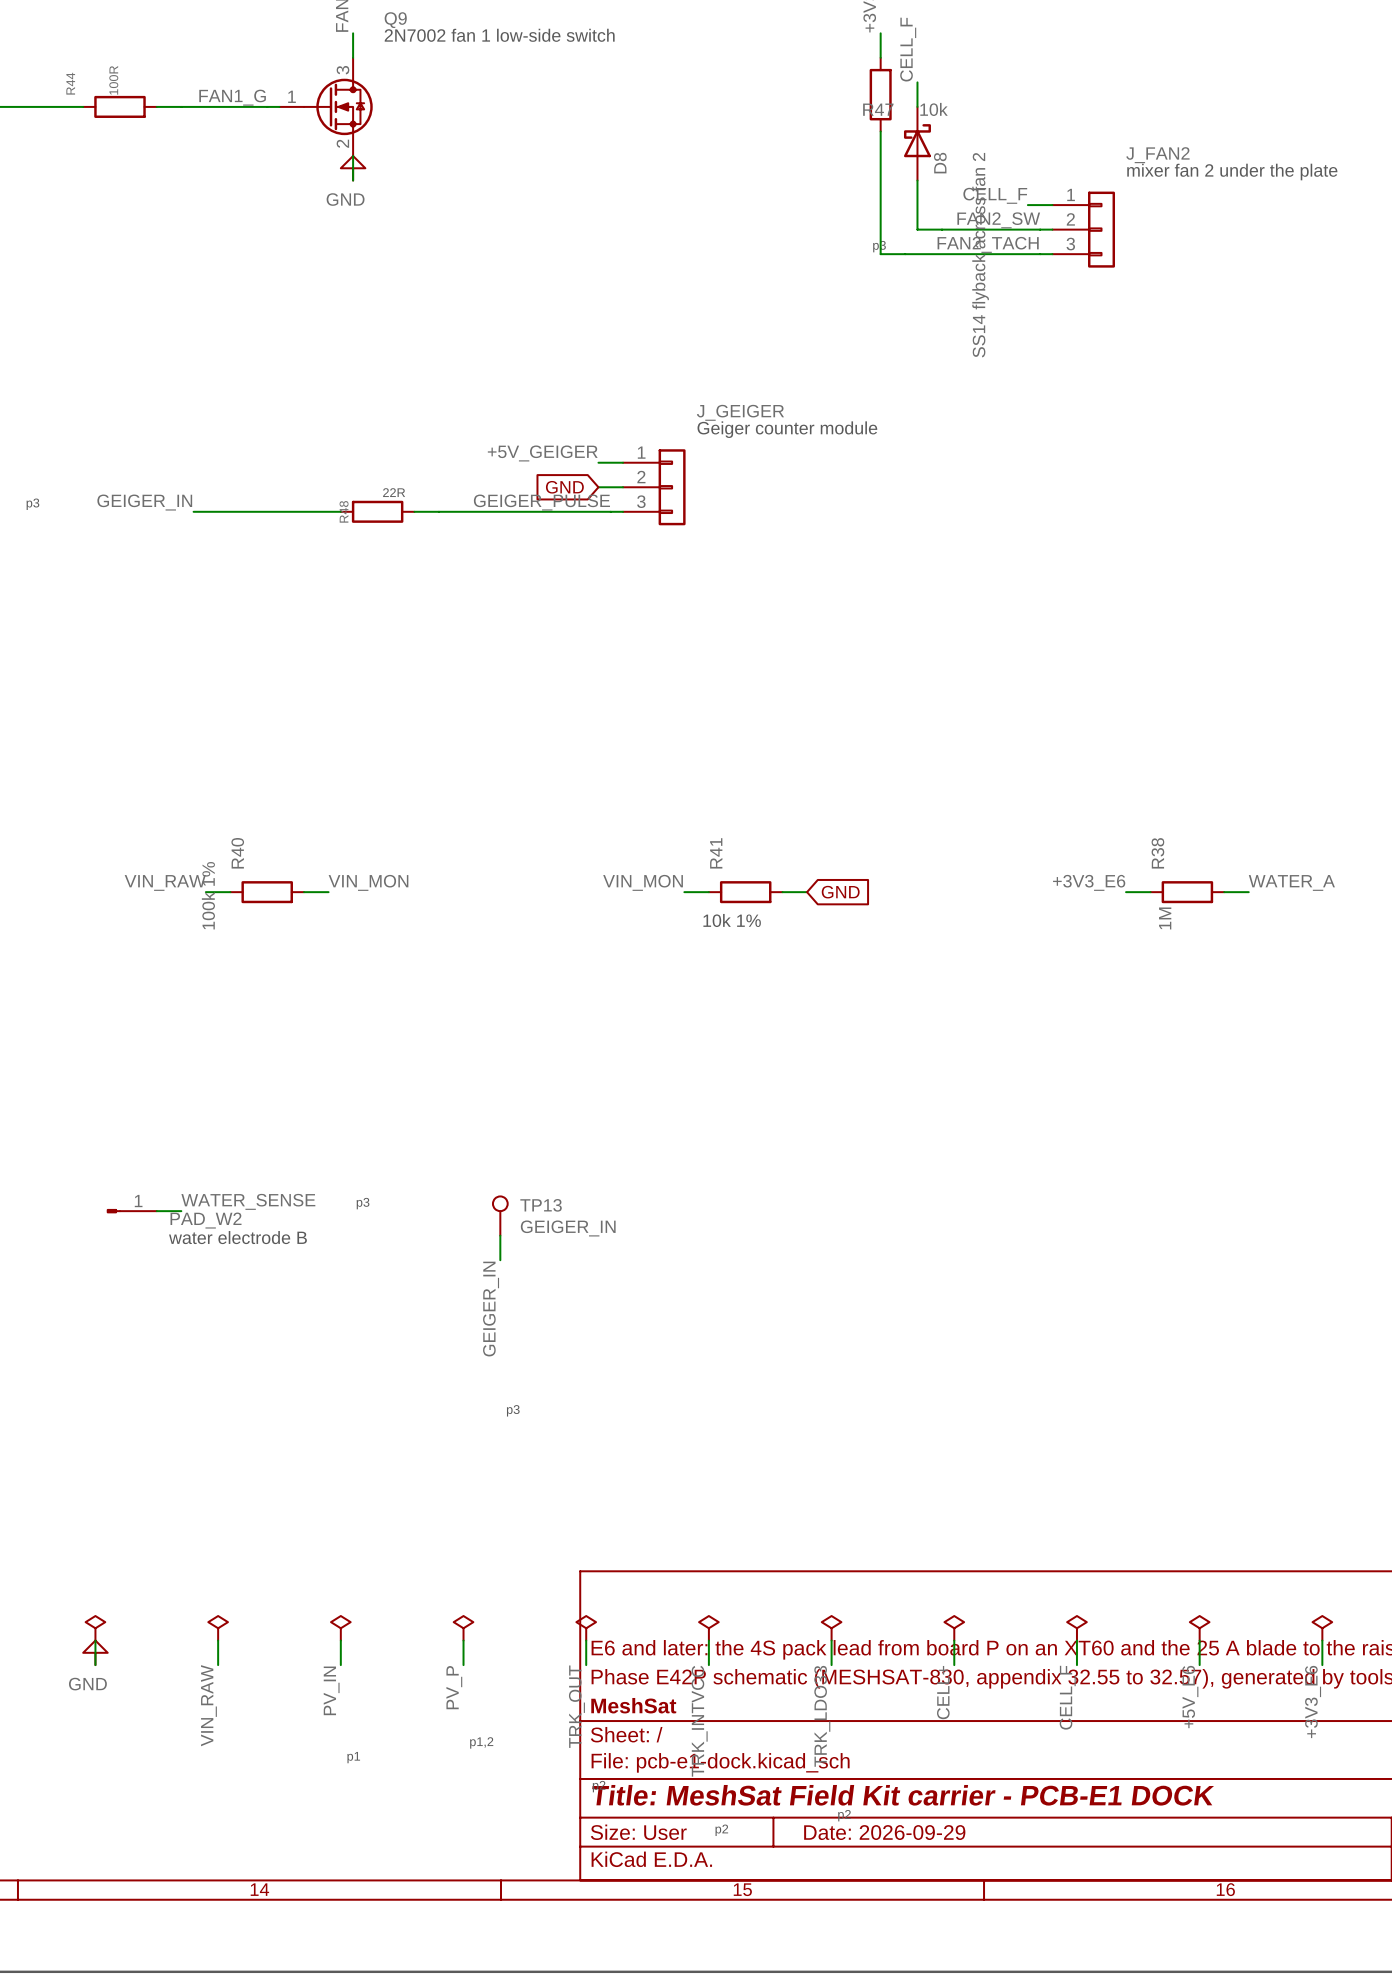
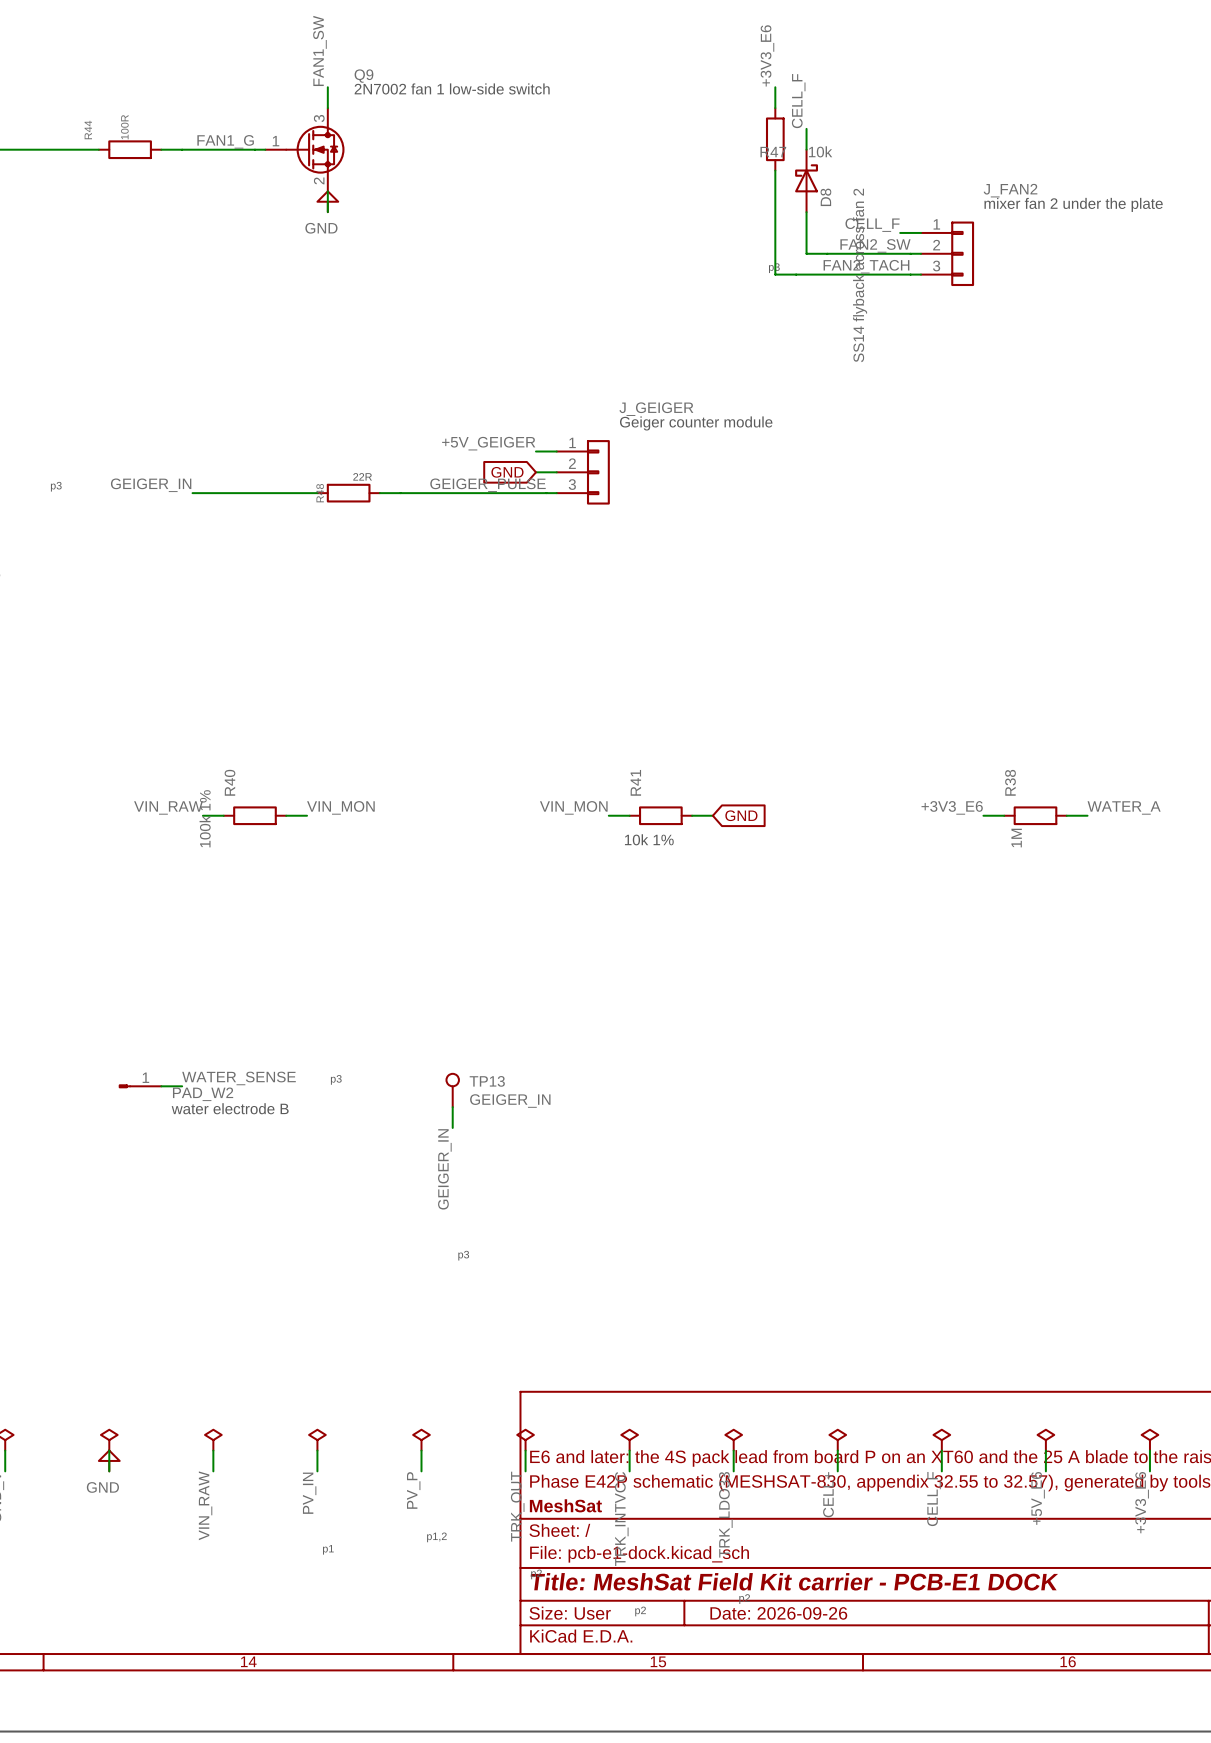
title block: Date: 2026-09-29 (884, 1832) -> Date: 2026-09-26 (778, 1613)

